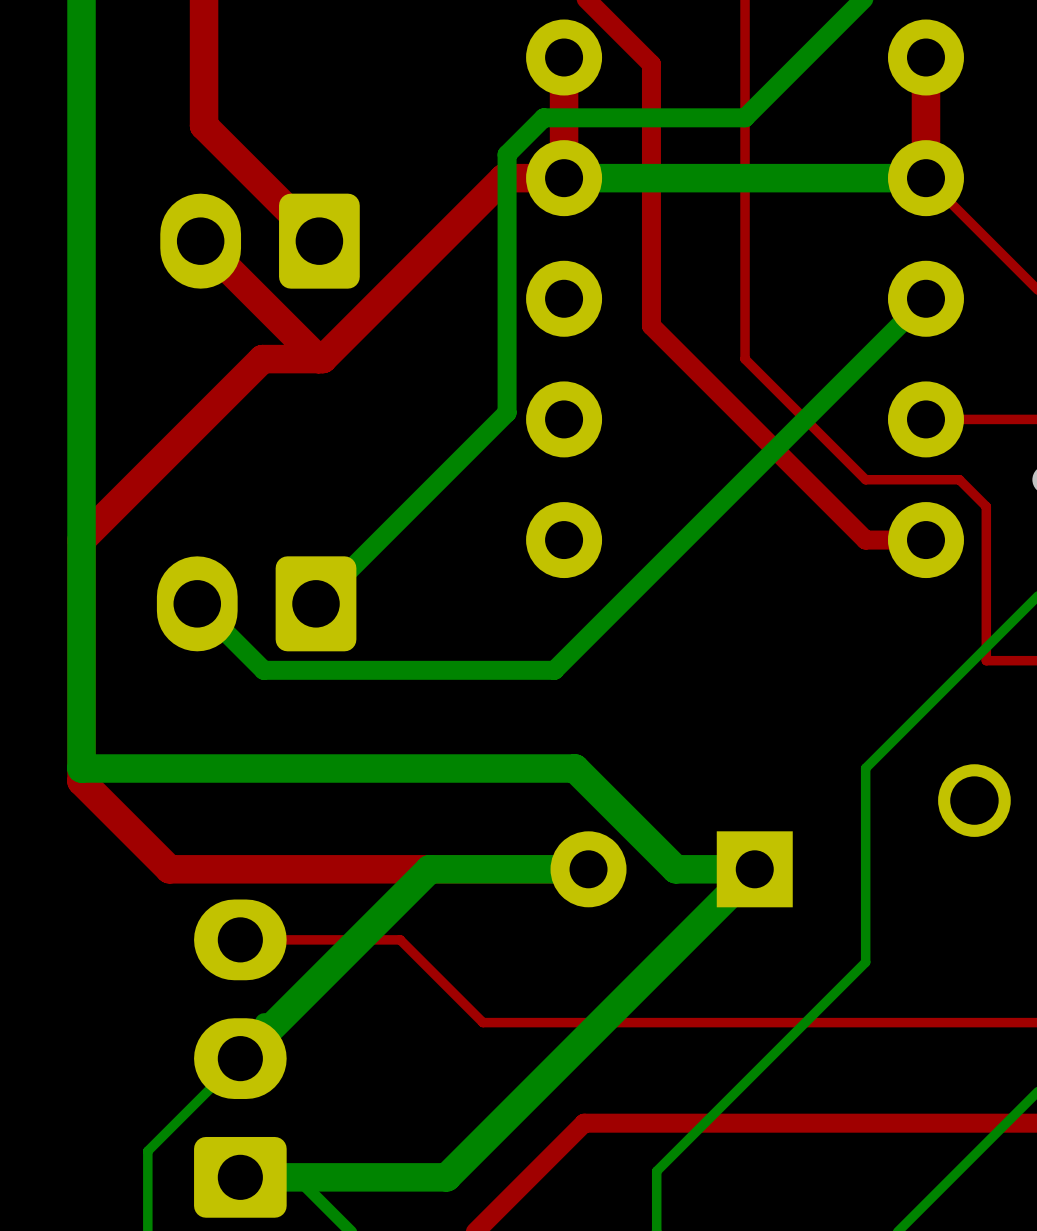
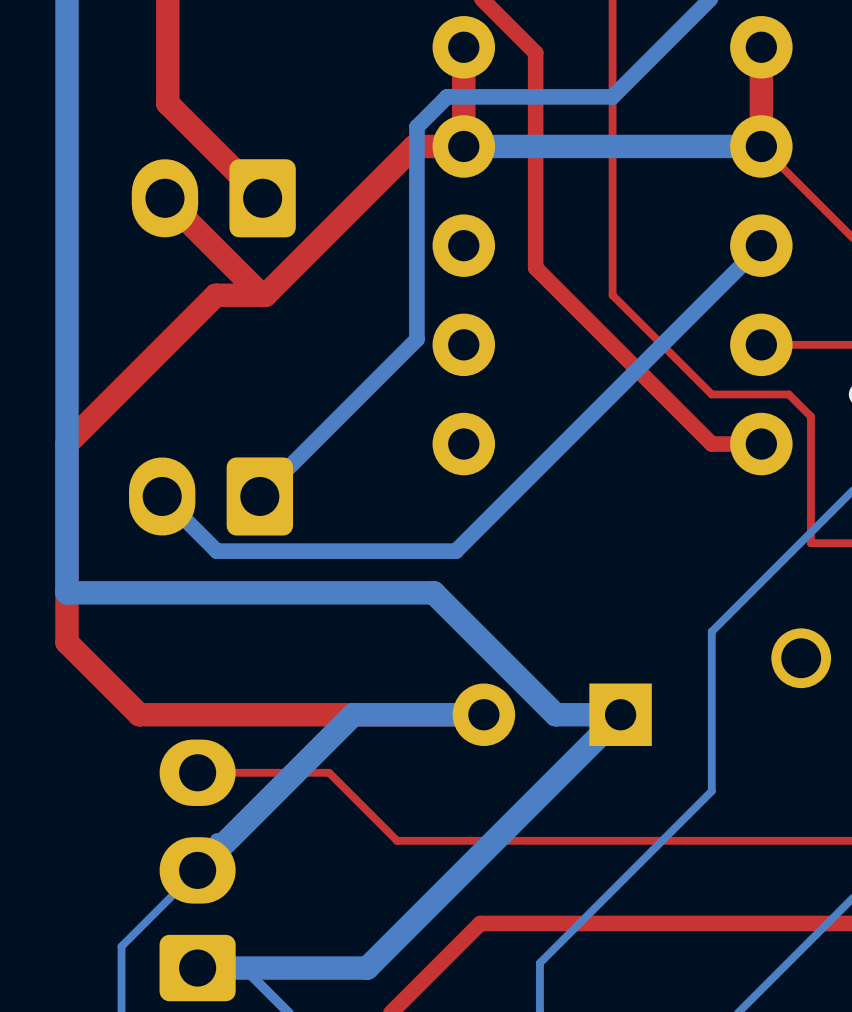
bottom track: (81, 721) (81, 768) (575, 768) -> (67, 592) (433, 592) (472, 631)

